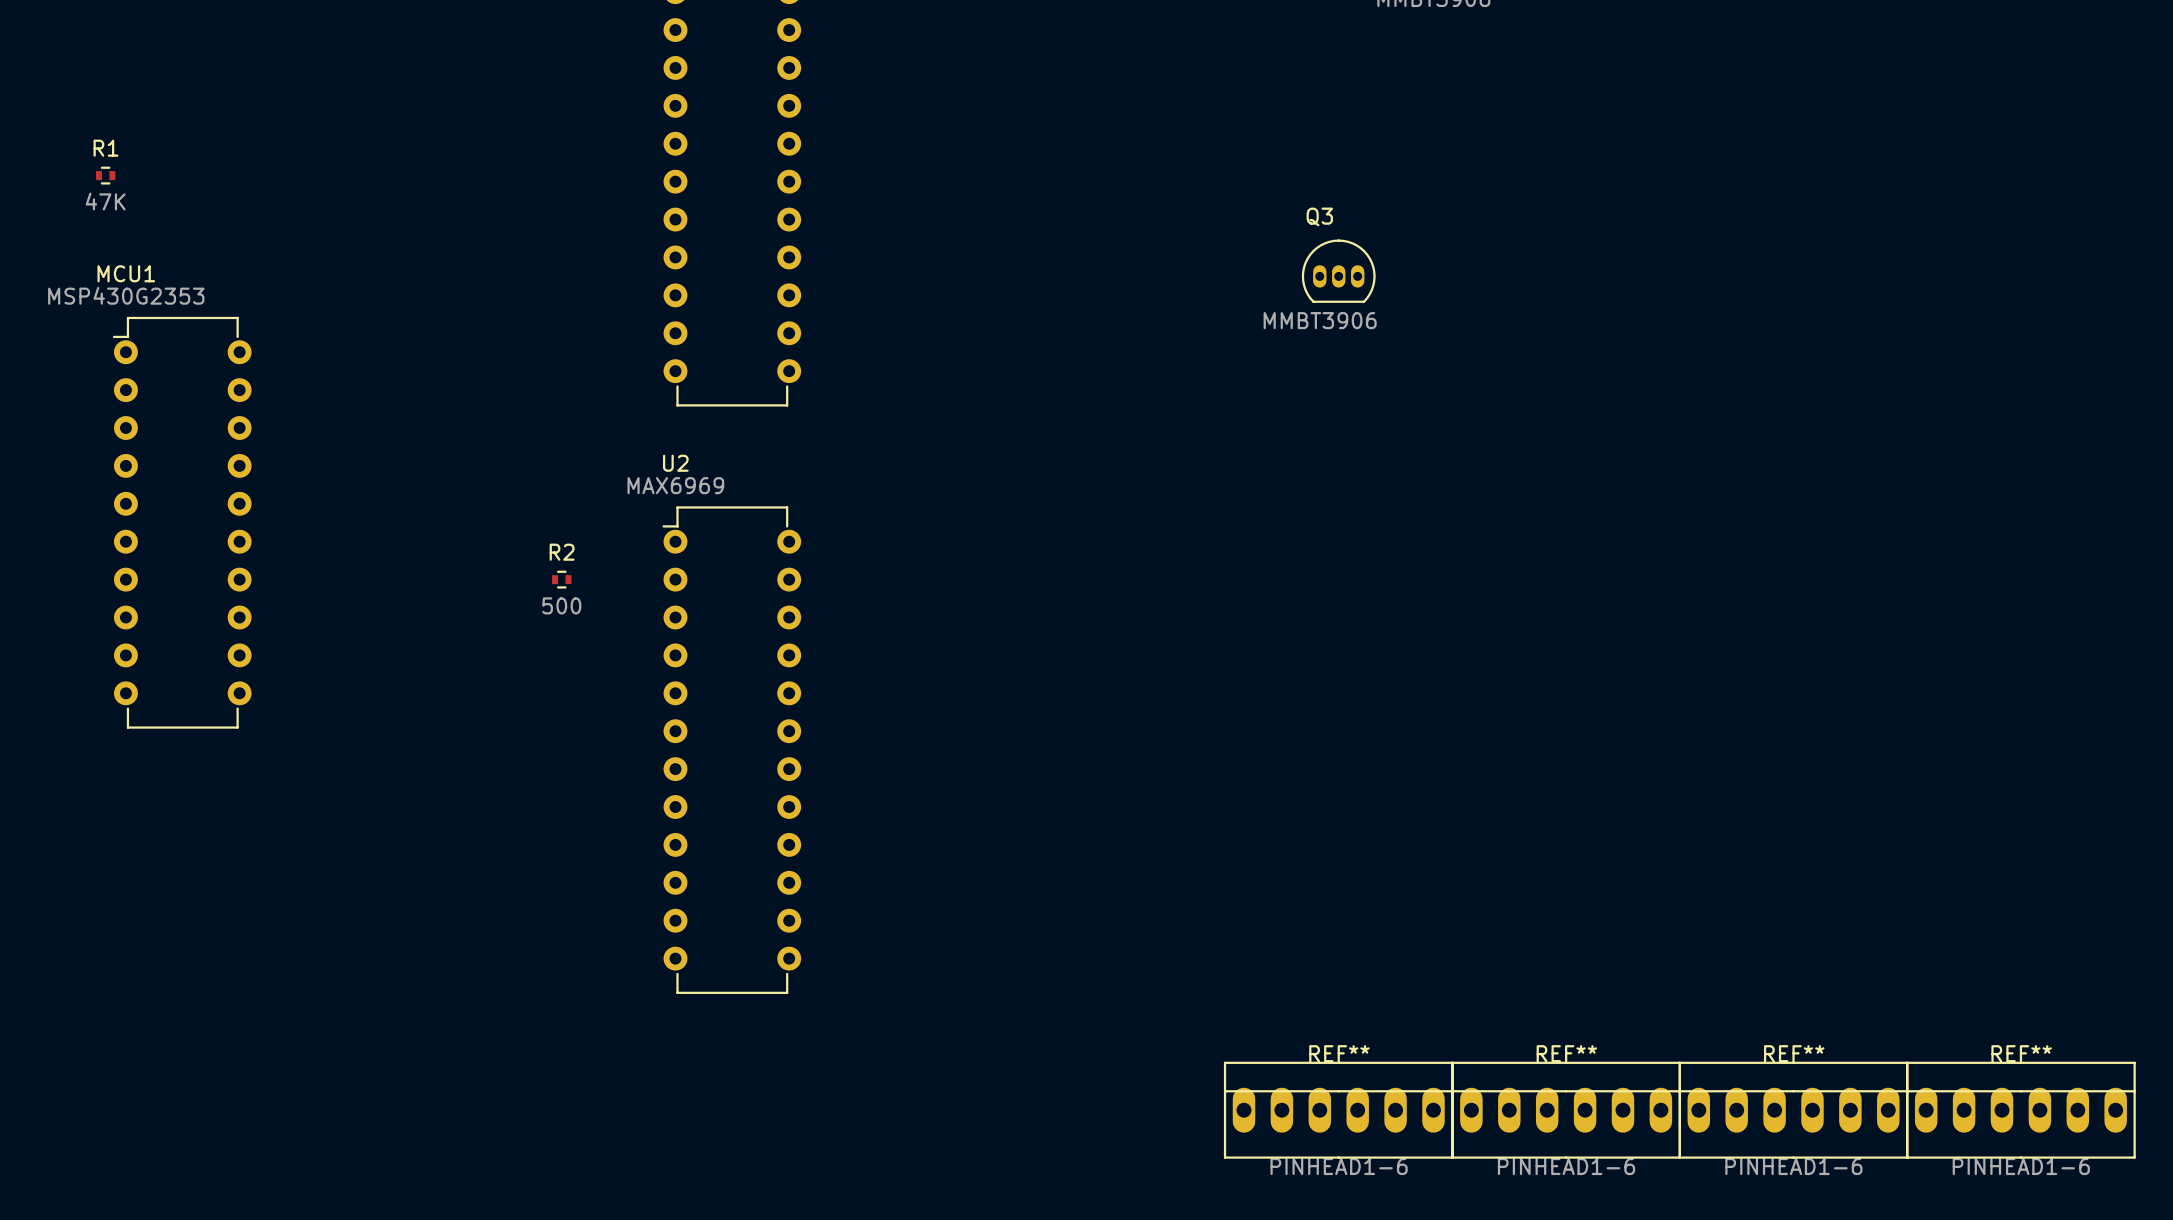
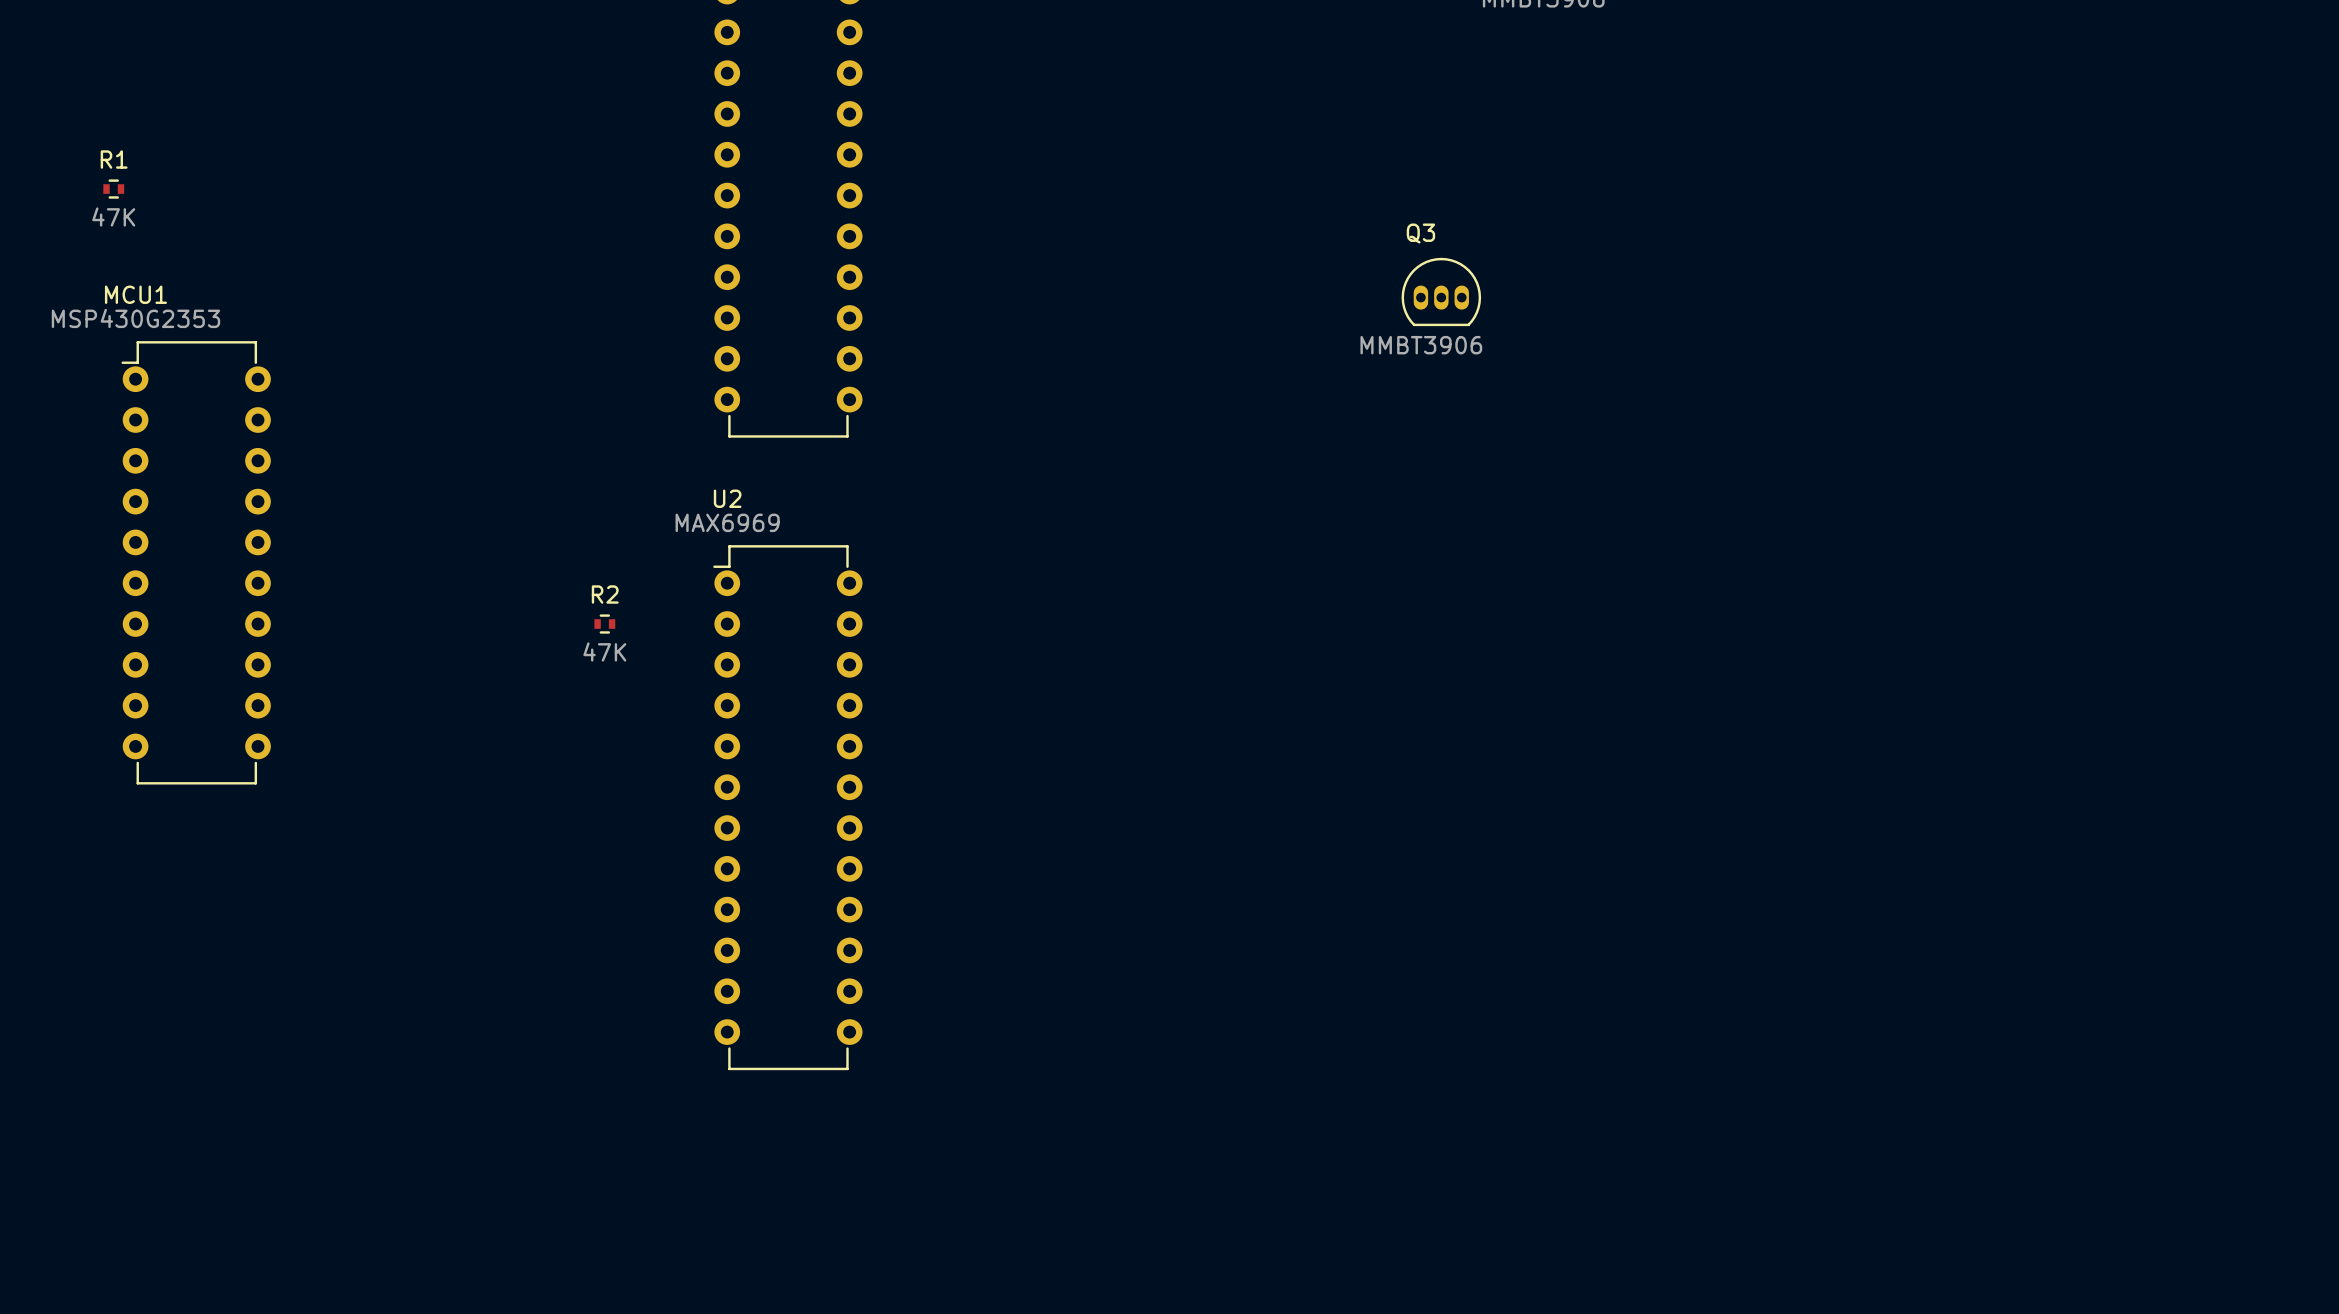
R2 value: 500 (561, 605) -> 47K (604, 651)
REF**: PINHEAD1-6 (1338, 1110) -> none
REF**: PINHEAD1-6 (1566, 1110) -> none
REF**: PINHEAD1-6 (1793, 1110) -> none
REF**: PINHEAD1-6 (2020, 1110) -> none

